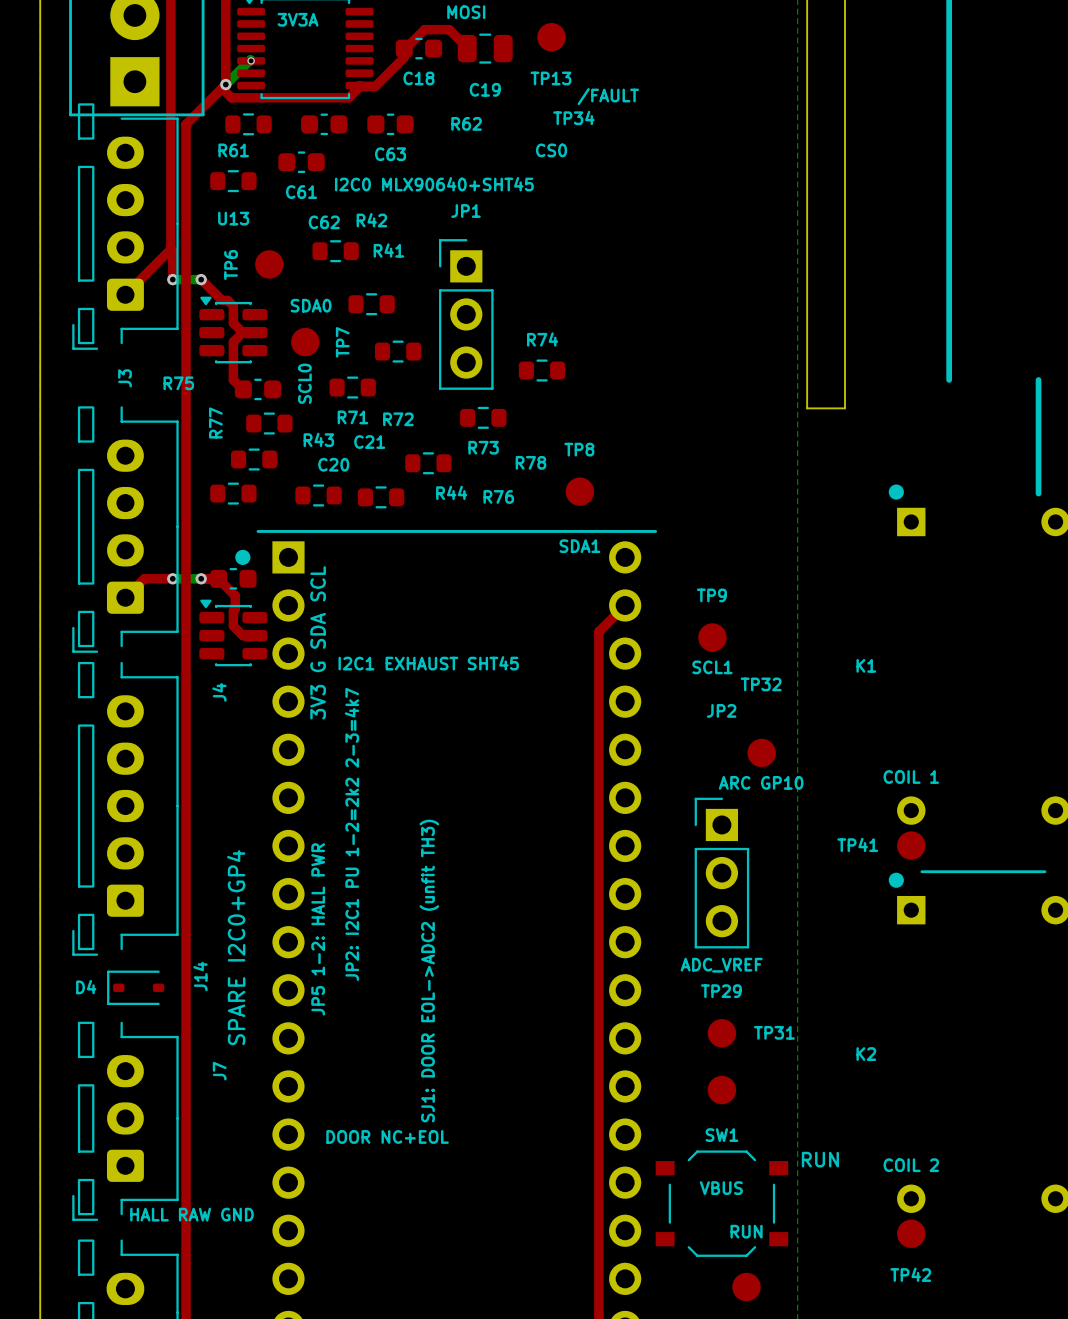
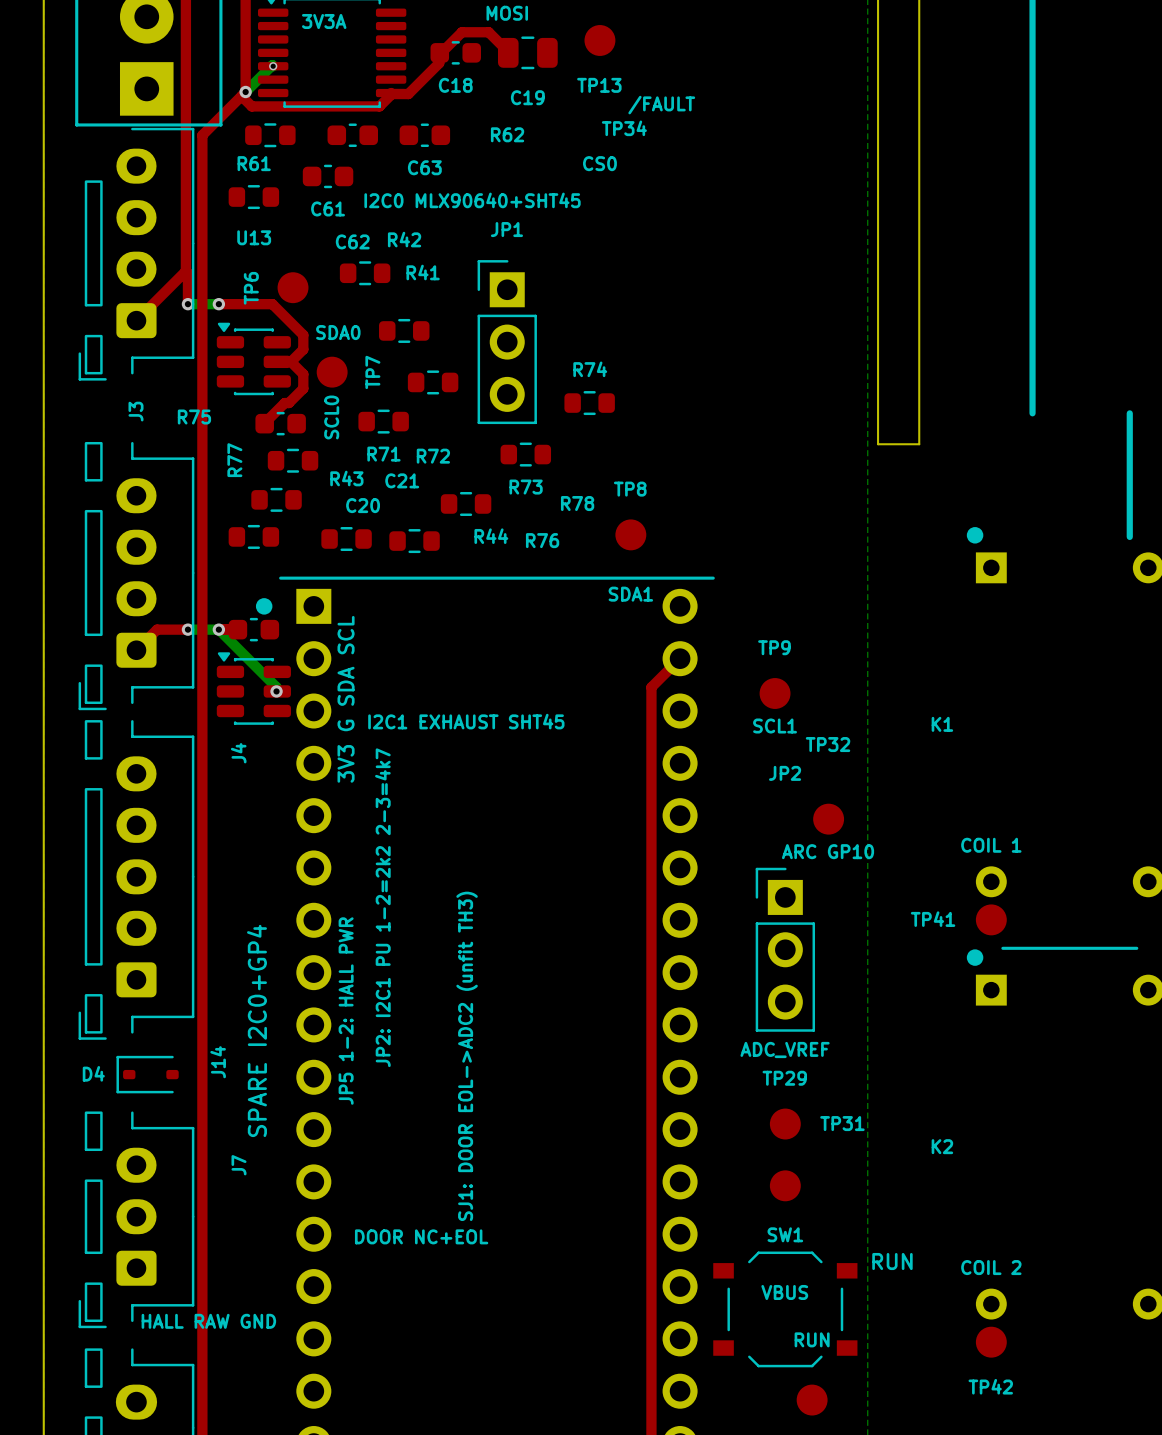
J3 footprint: [72, 103, 179, 350] -> [78, 127, 195, 381]
top track: (201, 279) (222, 300) (227, 300) (233, 306) (233, 323) (242, 332) -> (218, 304) (272, 304) (303, 335) (303, 349) (290, 361)
top track: (242, 332) (233, 342) (233, 379) (242, 389) -> (290, 361) (303, 374) (303, 388) (288, 403) (284, 403) (264, 423)
bottom track: none -> (218, 629) (276, 687) (276, 691)
top track: (218, 578) (235, 595) (233, 626) (242, 635) (254, 635) -> none
via: none -> (276, 691)

